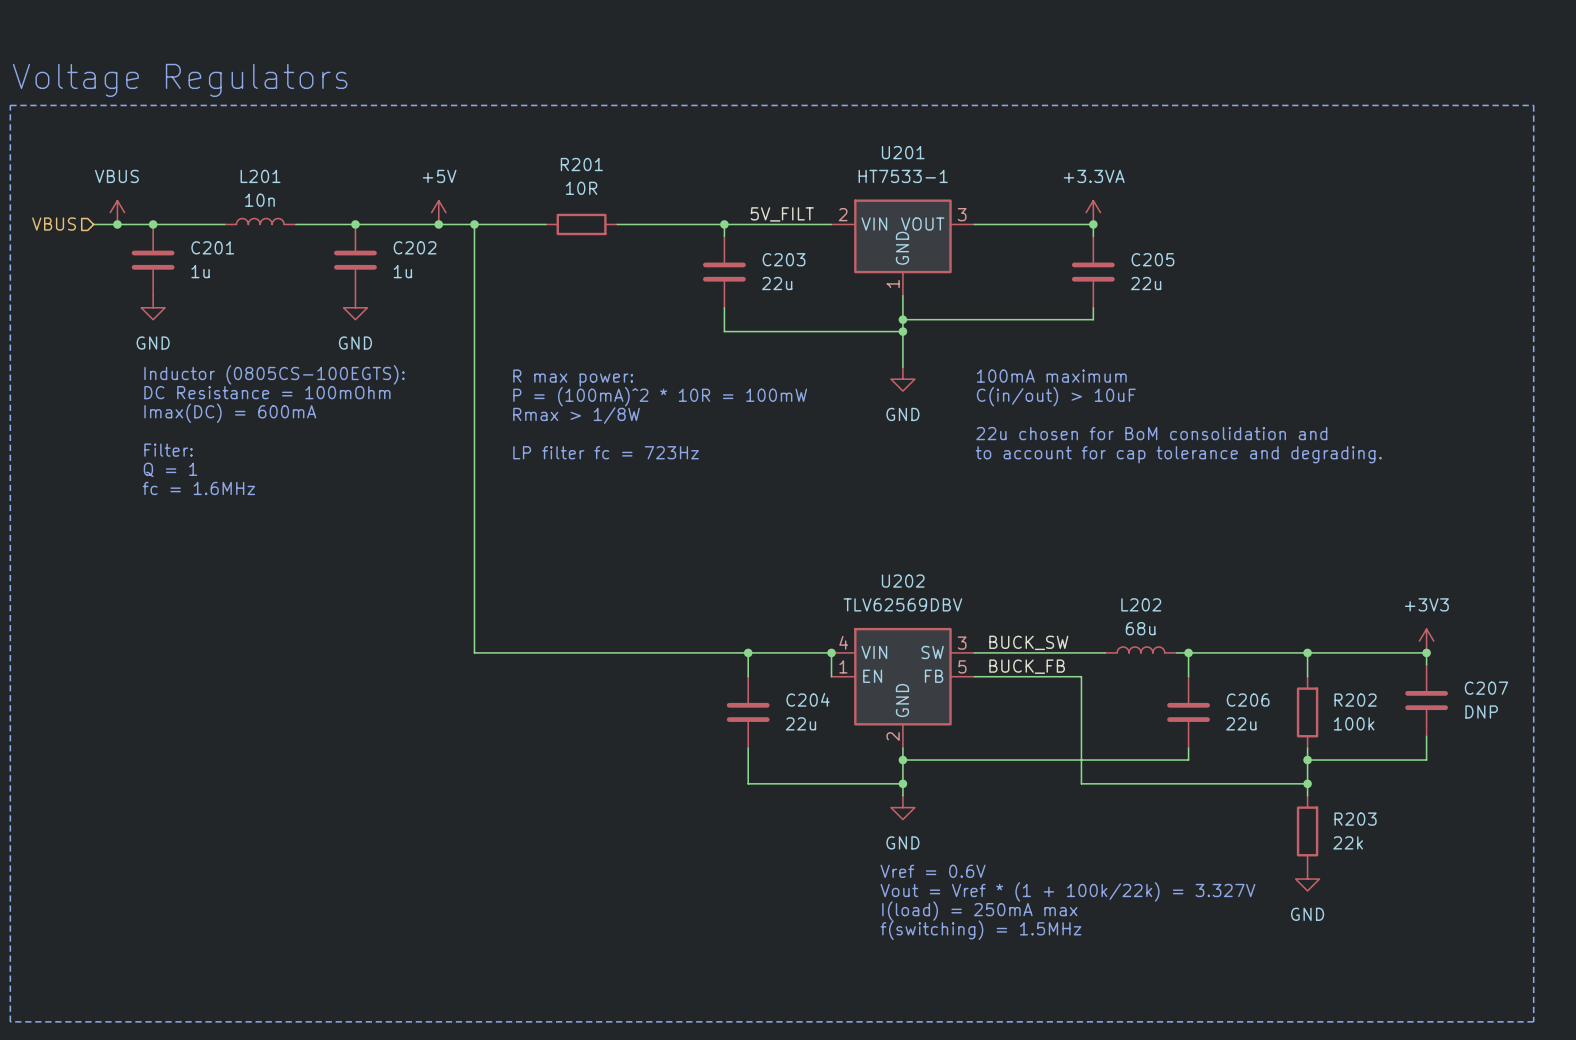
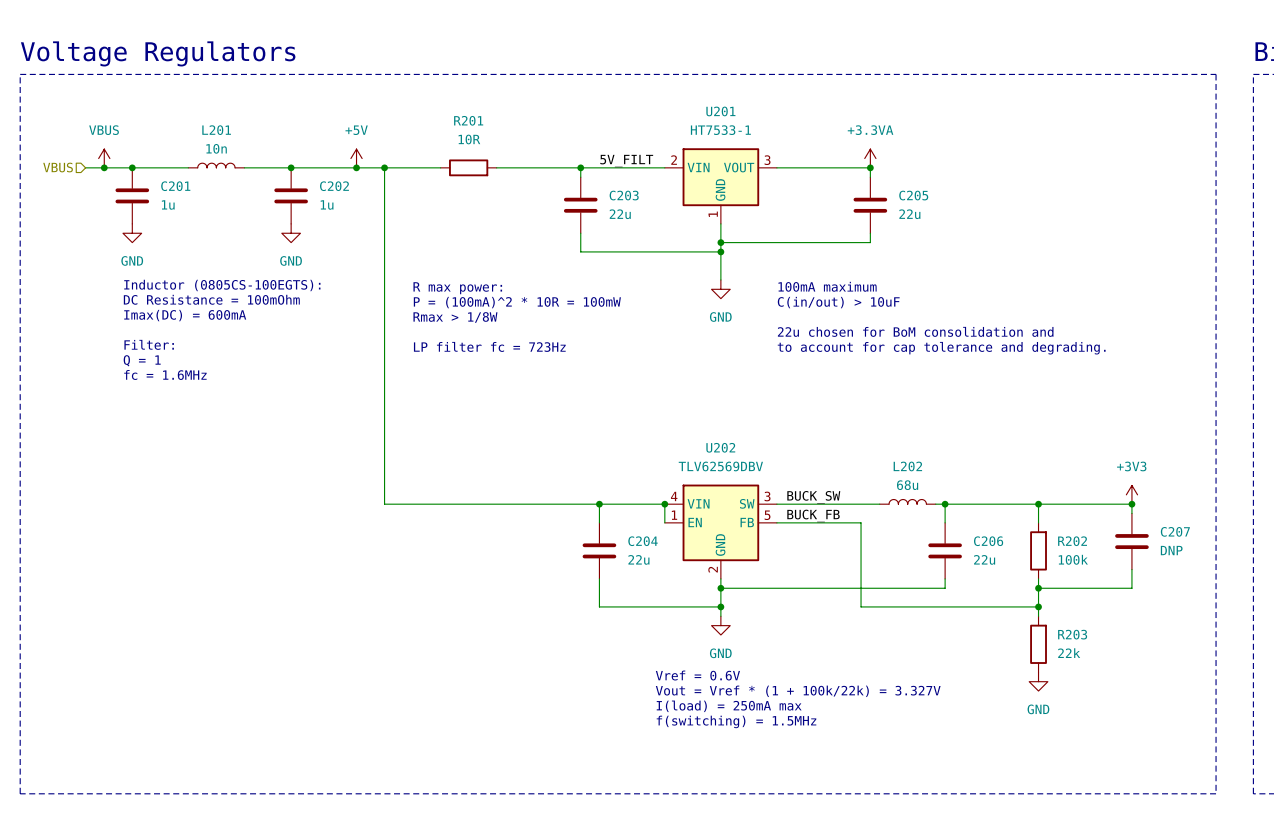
text position: Vref = 0.6V (933, 871) -> Vref = 0.6V (697, 675)
text position: Vout = Vref * (1 + 100k/22k) = 3.327V (1067, 891) -> Vout = Vref * (1 + 100k/22k) = 3.327V (798, 691)
text position: I(load) = 250mA max (979, 911) -> I(load) = 250mA max (729, 706)
text position: f(switching) = 1.5MHz (980, 930) -> f(switching) = 1.5MHz (736, 721)

